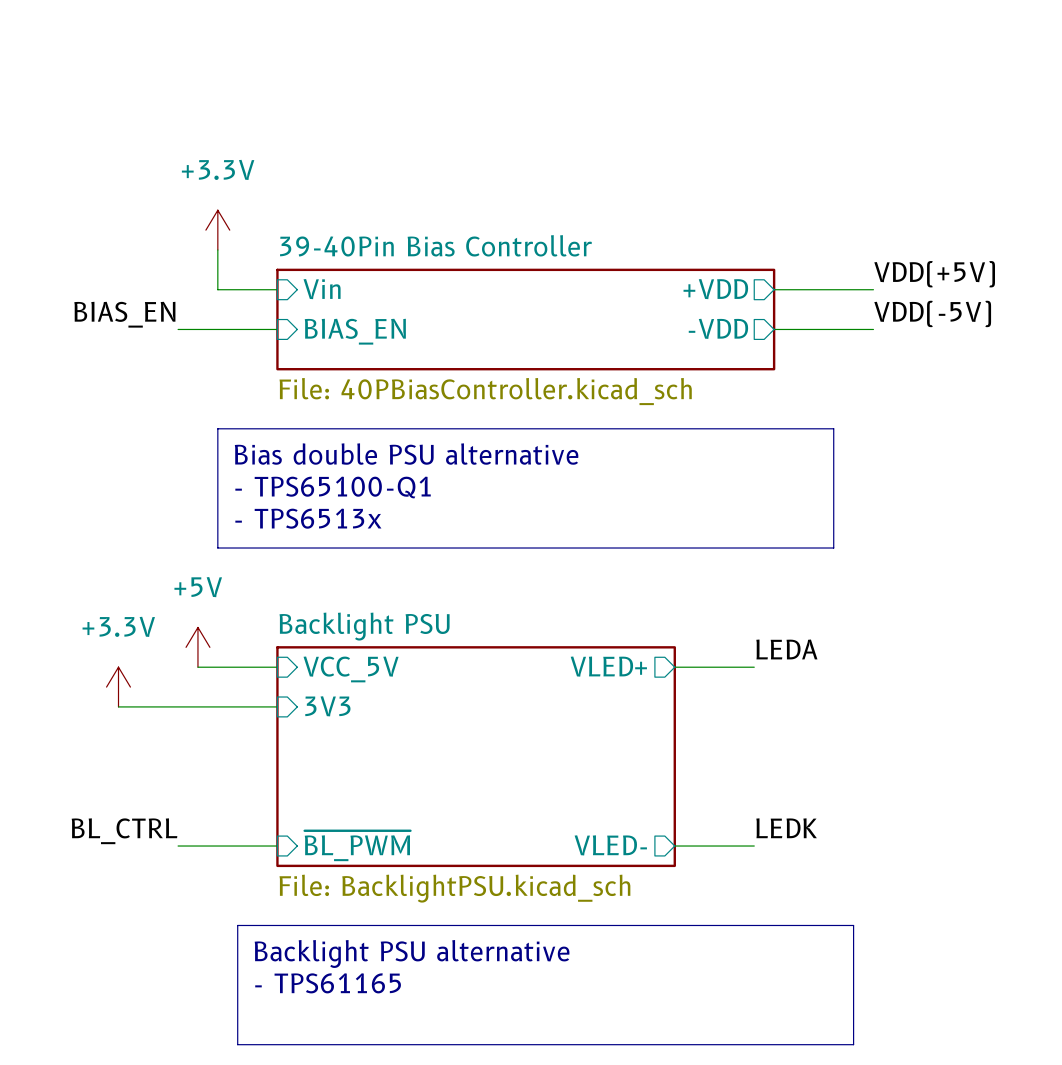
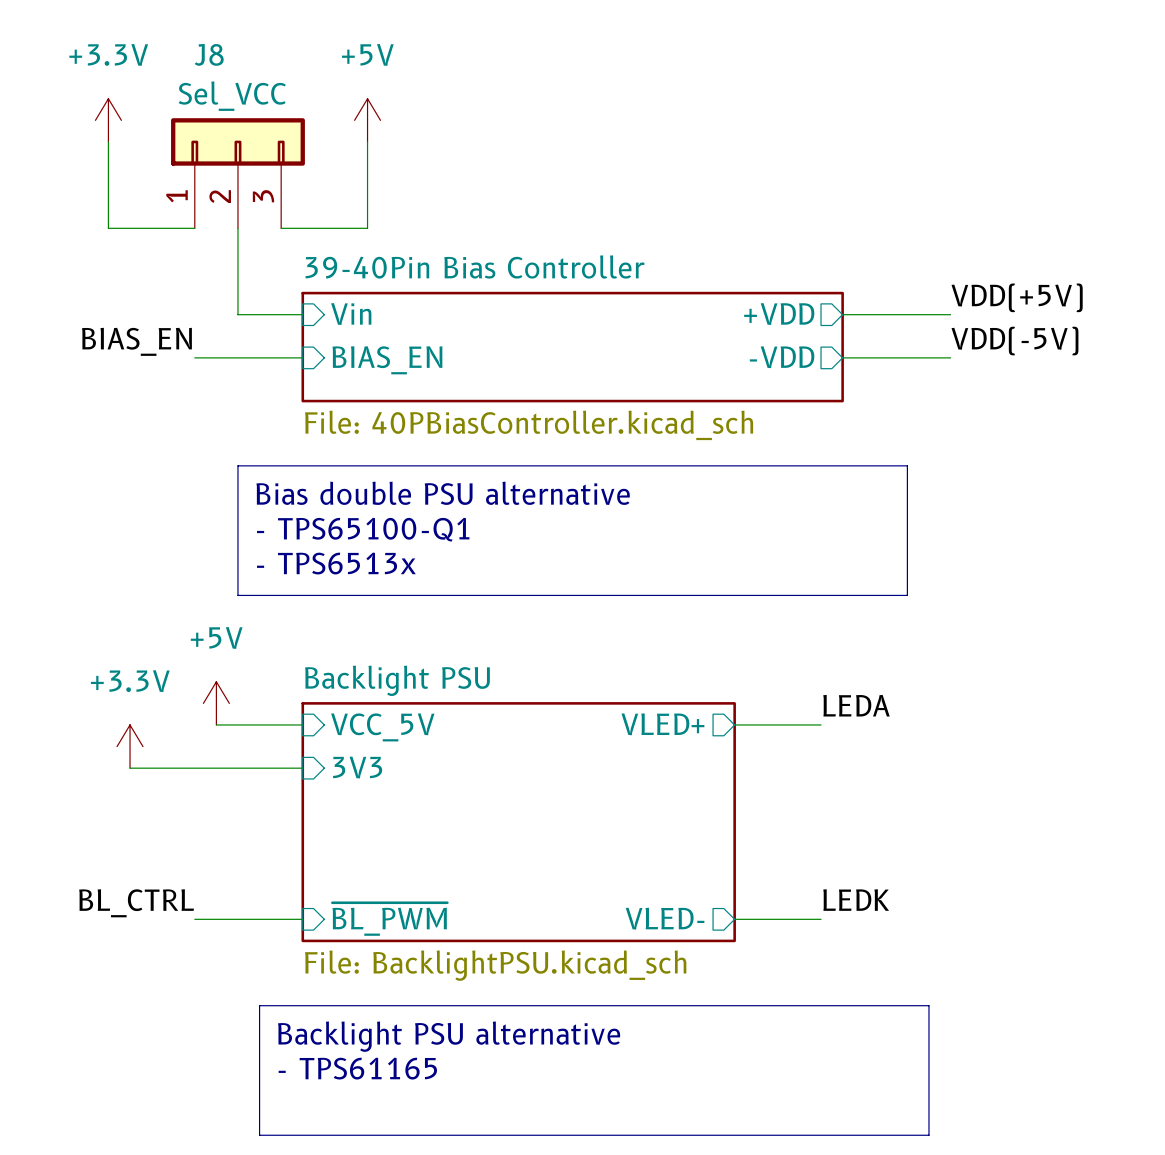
power symbol: none -> +5V (367, 120)
wire: none -> (108, 141) (108, 228) (194, 228)
wire: none -> (367, 141) (367, 228) (281, 228)
J8: none -> Sel_VCC (237, 173)
power symbol position: +3.3V (217, 230) -> +3.3V (108, 120)

